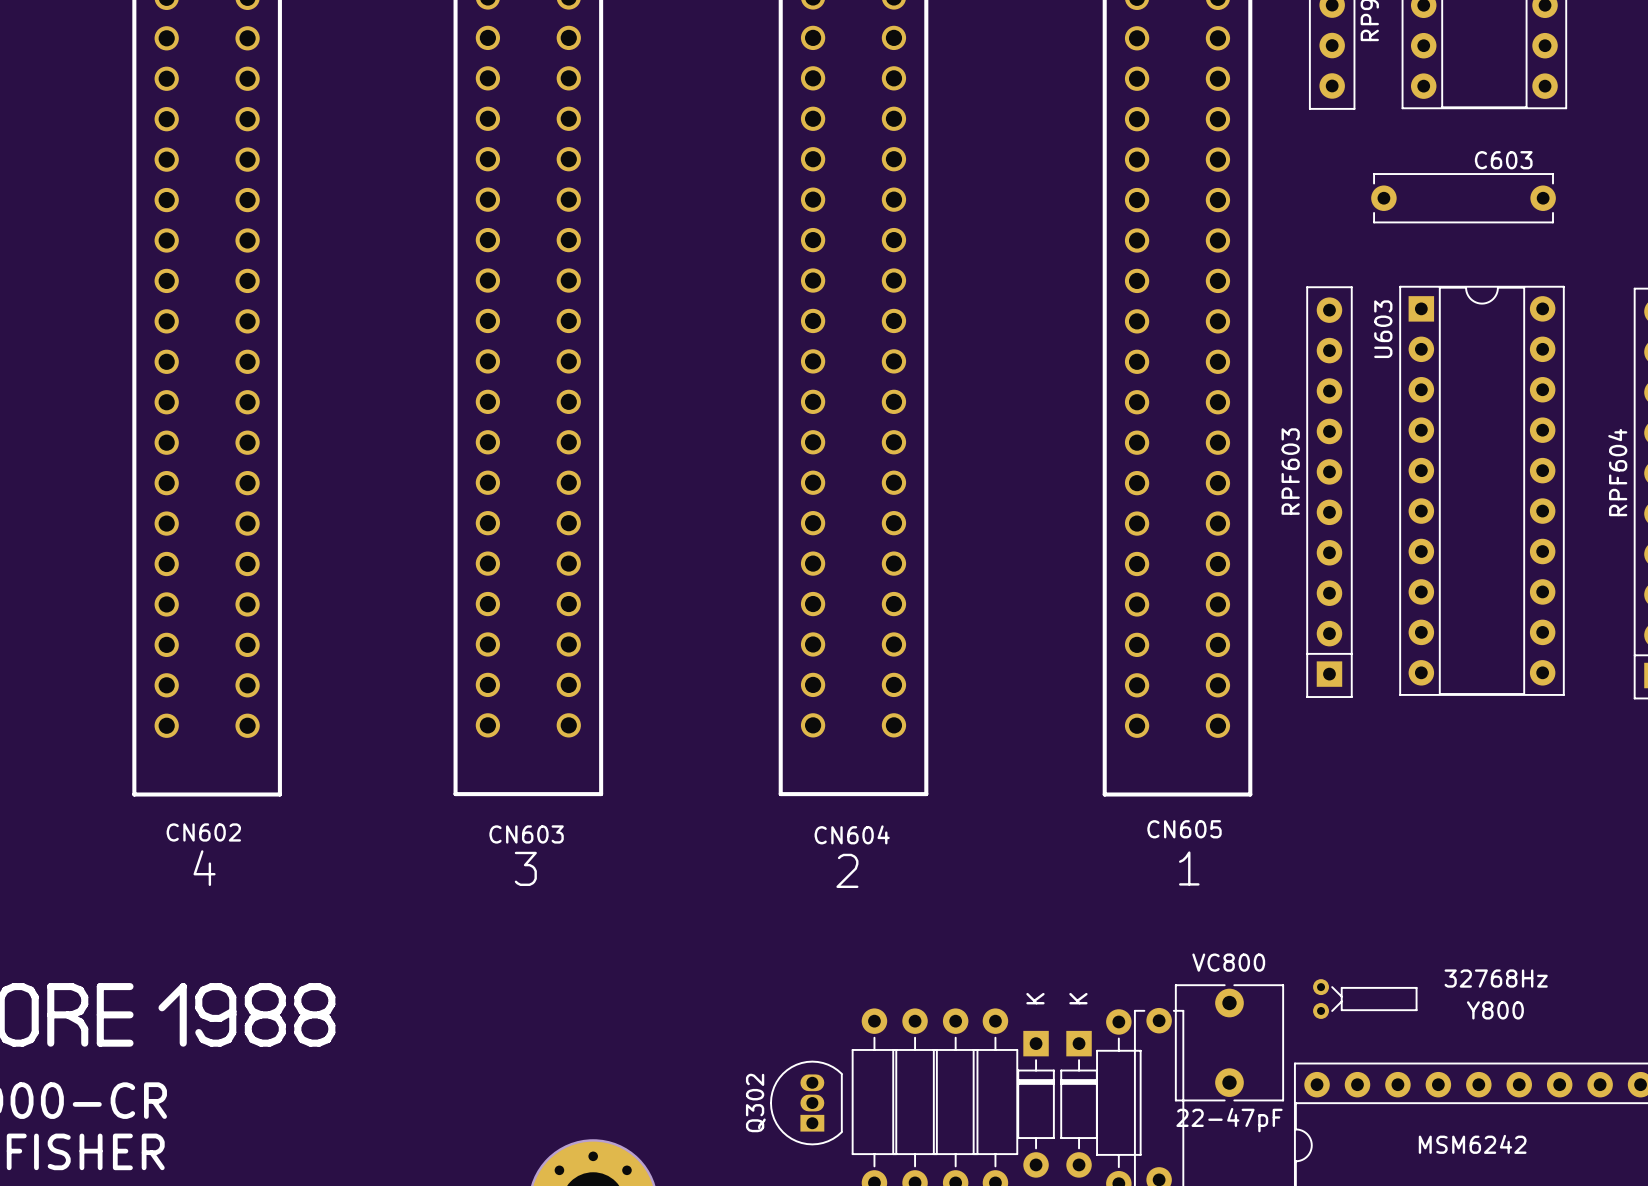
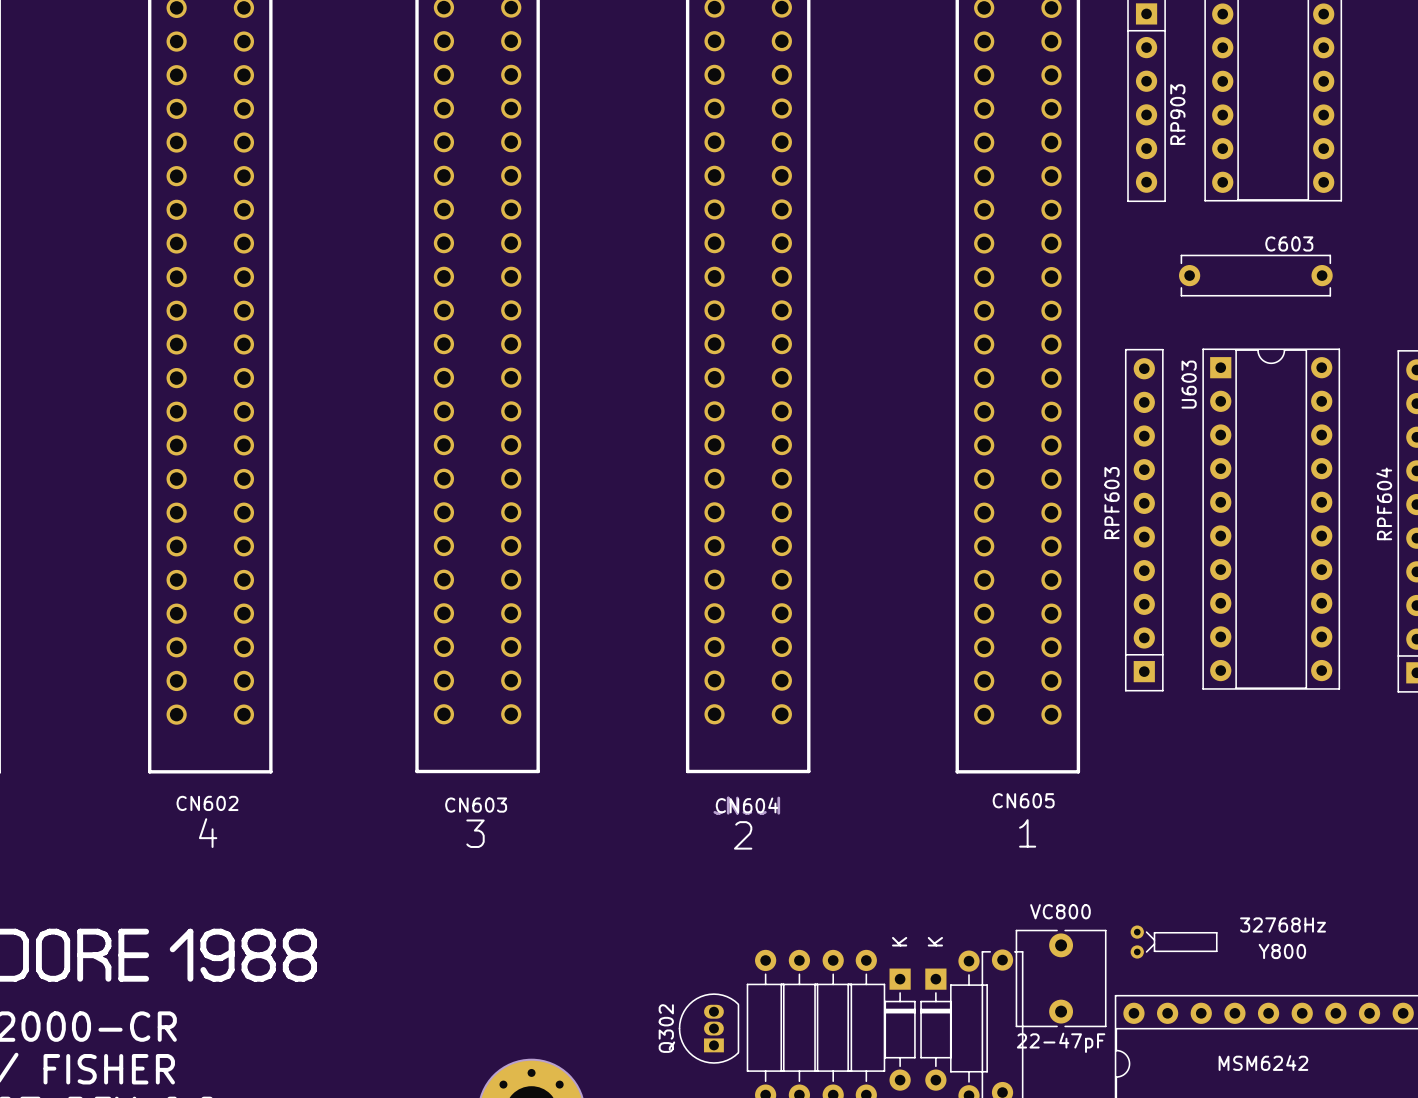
line: none -> (737, 797) (737, 813) (728, 797) (728, 813)
line: none -> (778, 797) (778, 813)
line: none -> (714, 812) (721, 812)
line: none -> (743, 812) (750, 812)
line: none -> (758, 812) (765, 812)

